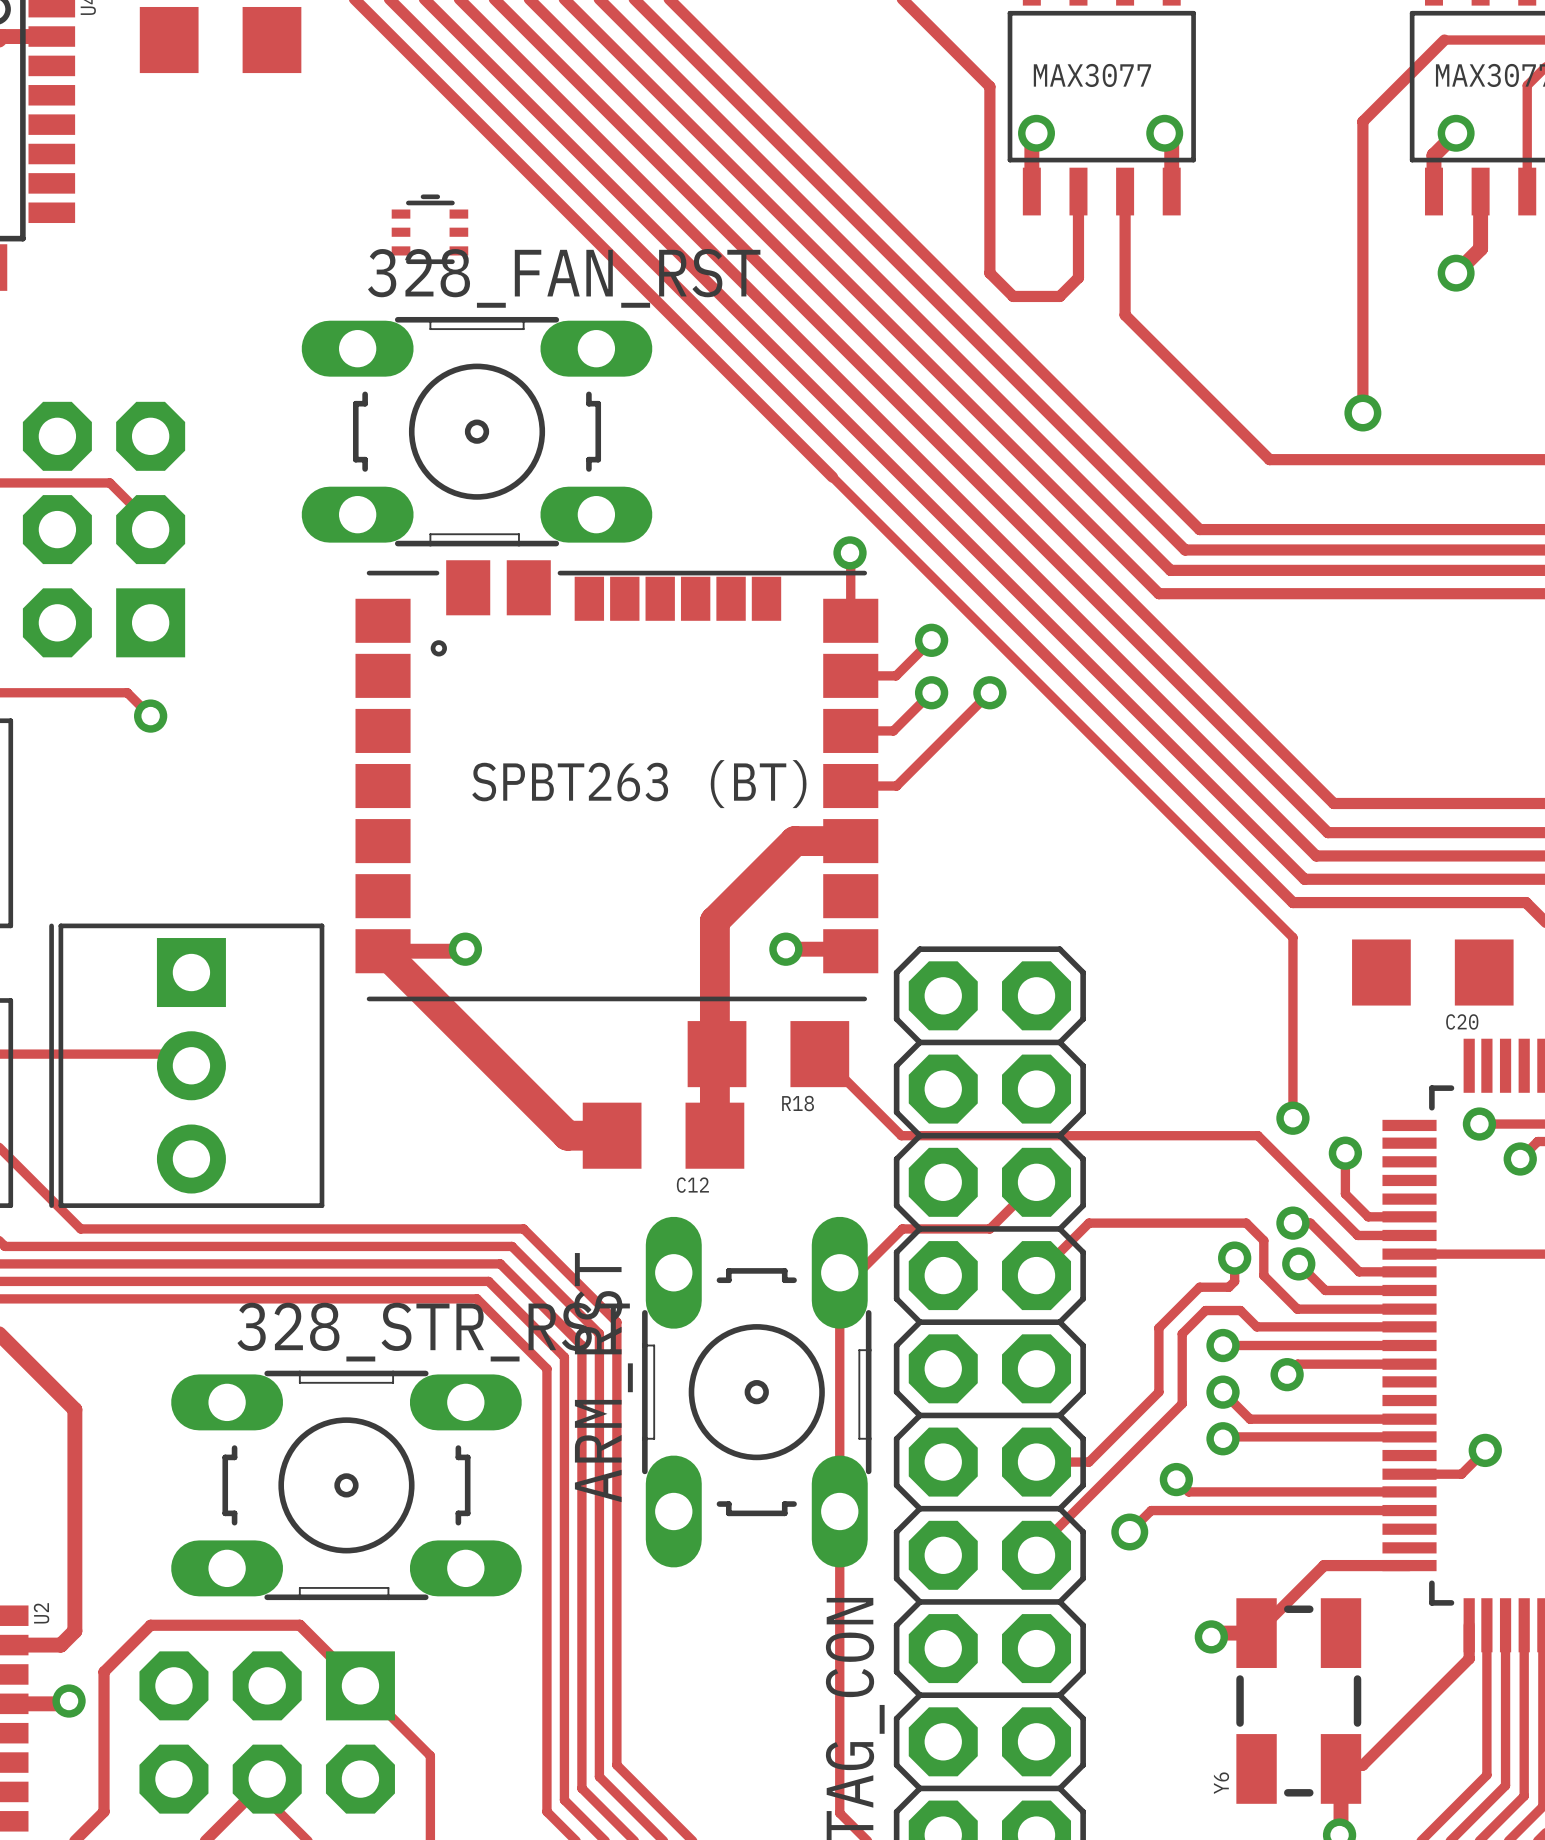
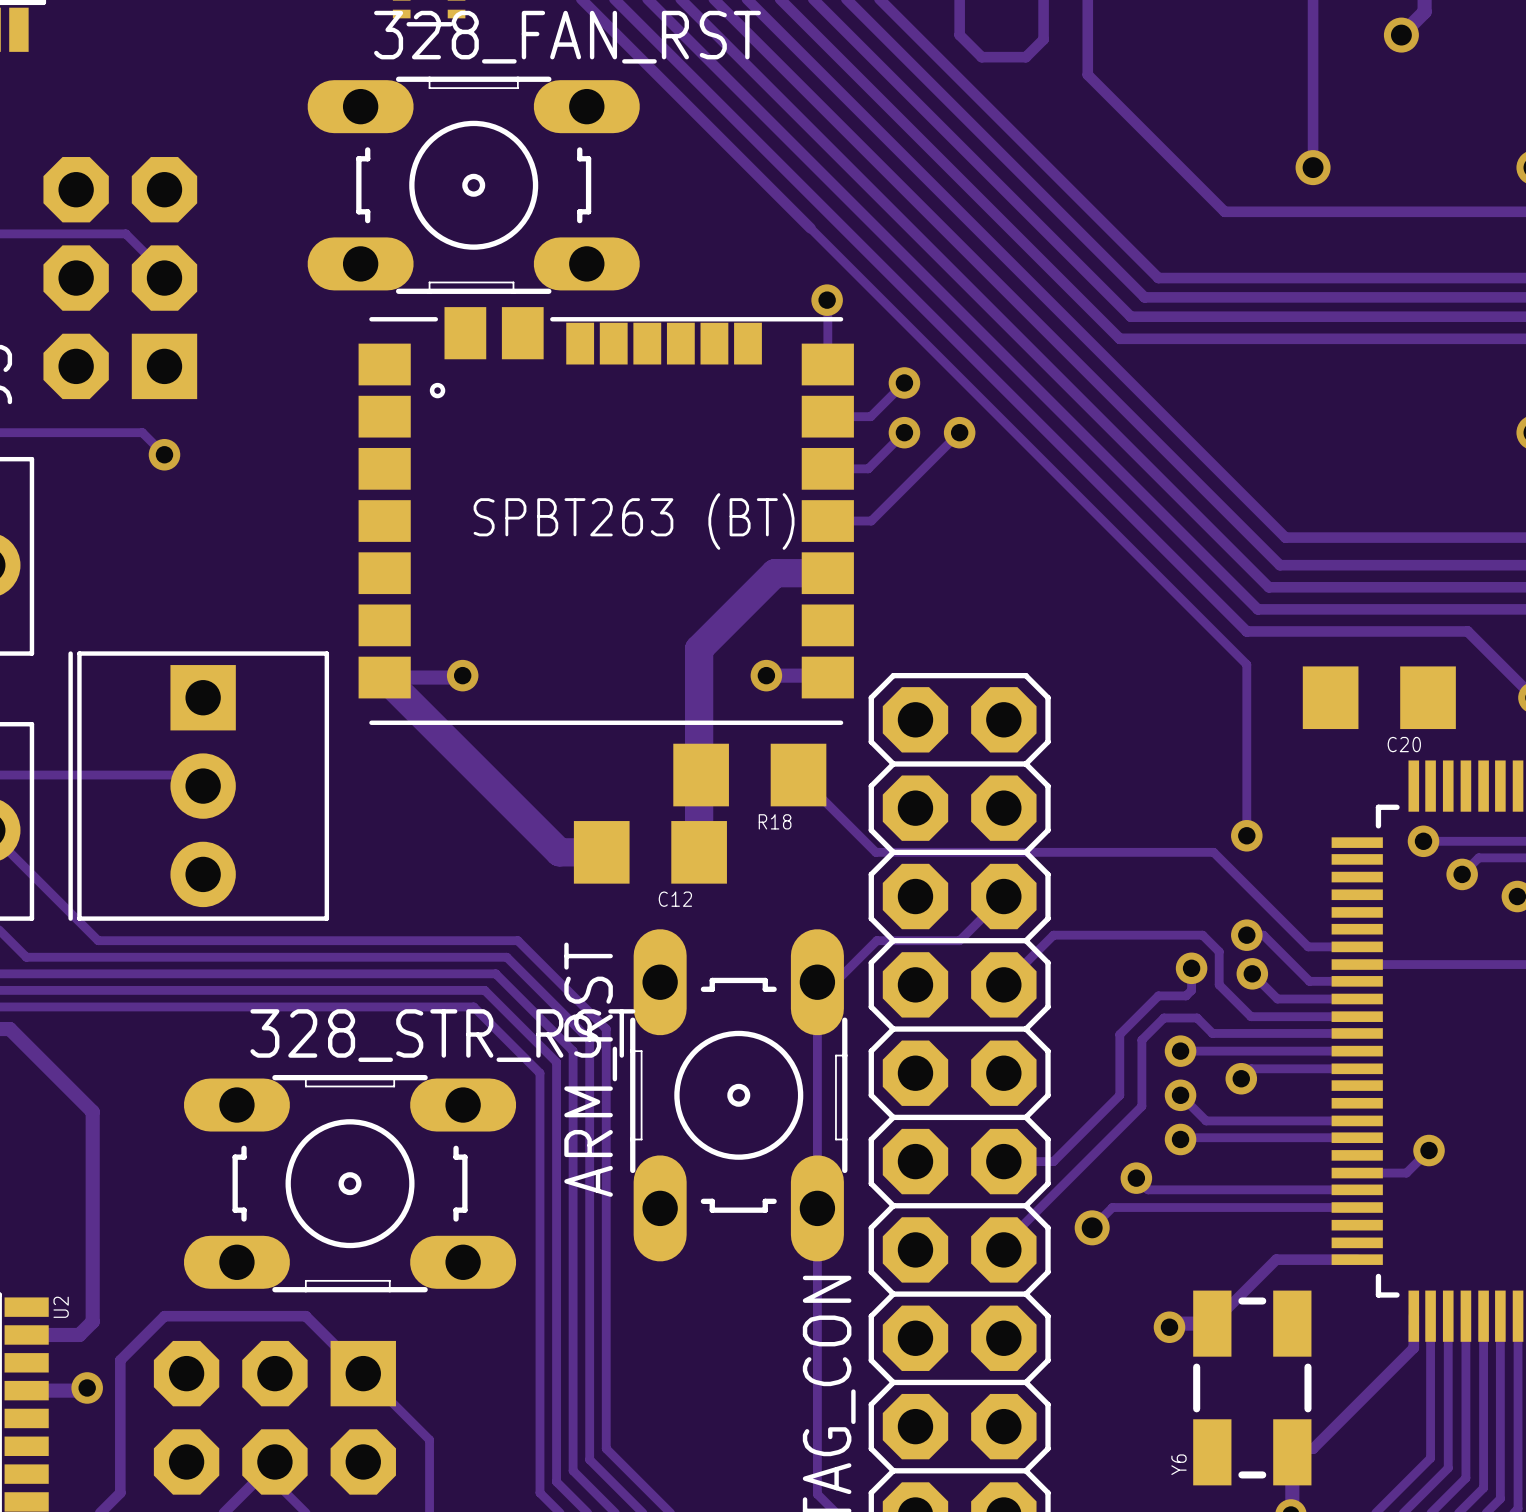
track: (1345, 1153) (1345, 1193) (1368, 1216) (1409, 1216) -> none
via: (1345, 1153) -> none

